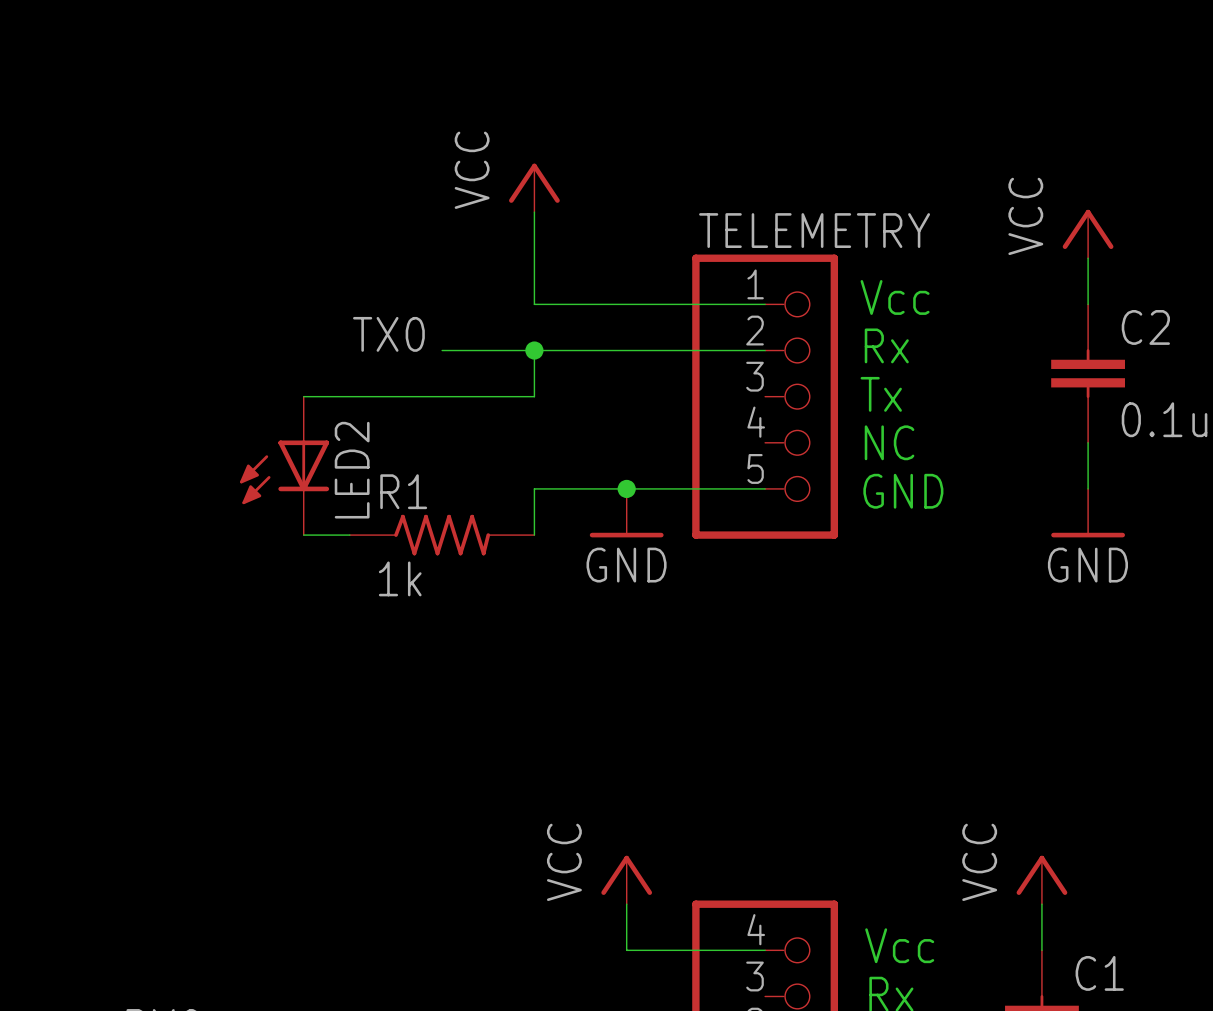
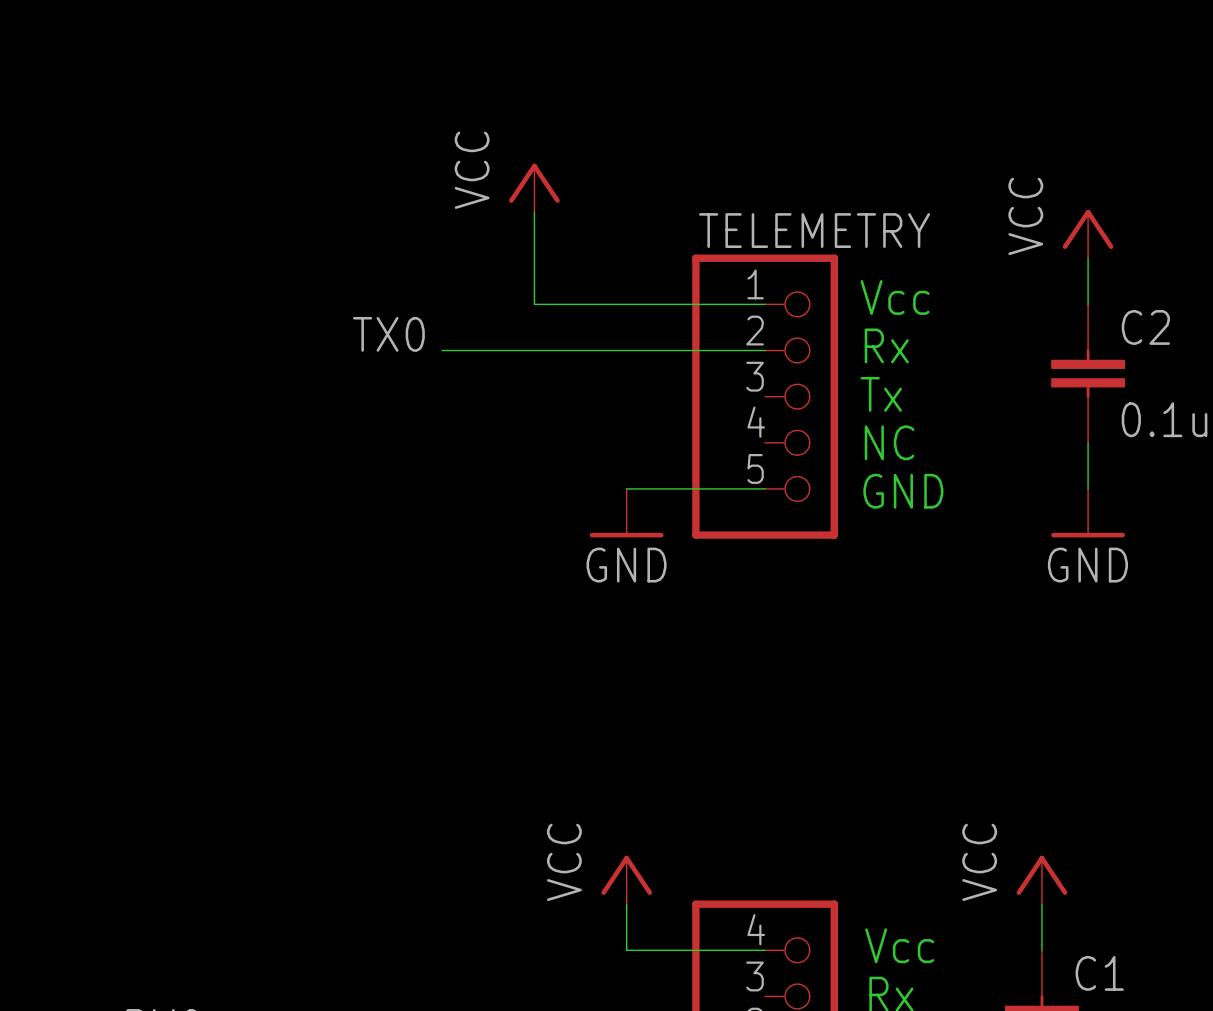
wire: (534, 350) (534, 396) (303, 396) -> none
junction: (534, 350) -> none
LED2: (284, 465) -> none
wire: (626, 488) (534, 488) (534, 535) -> none
junction: (626, 488) -> none
wire: (303, 535) (349, 535) -> none
R1: 1k (442, 535) -> none

